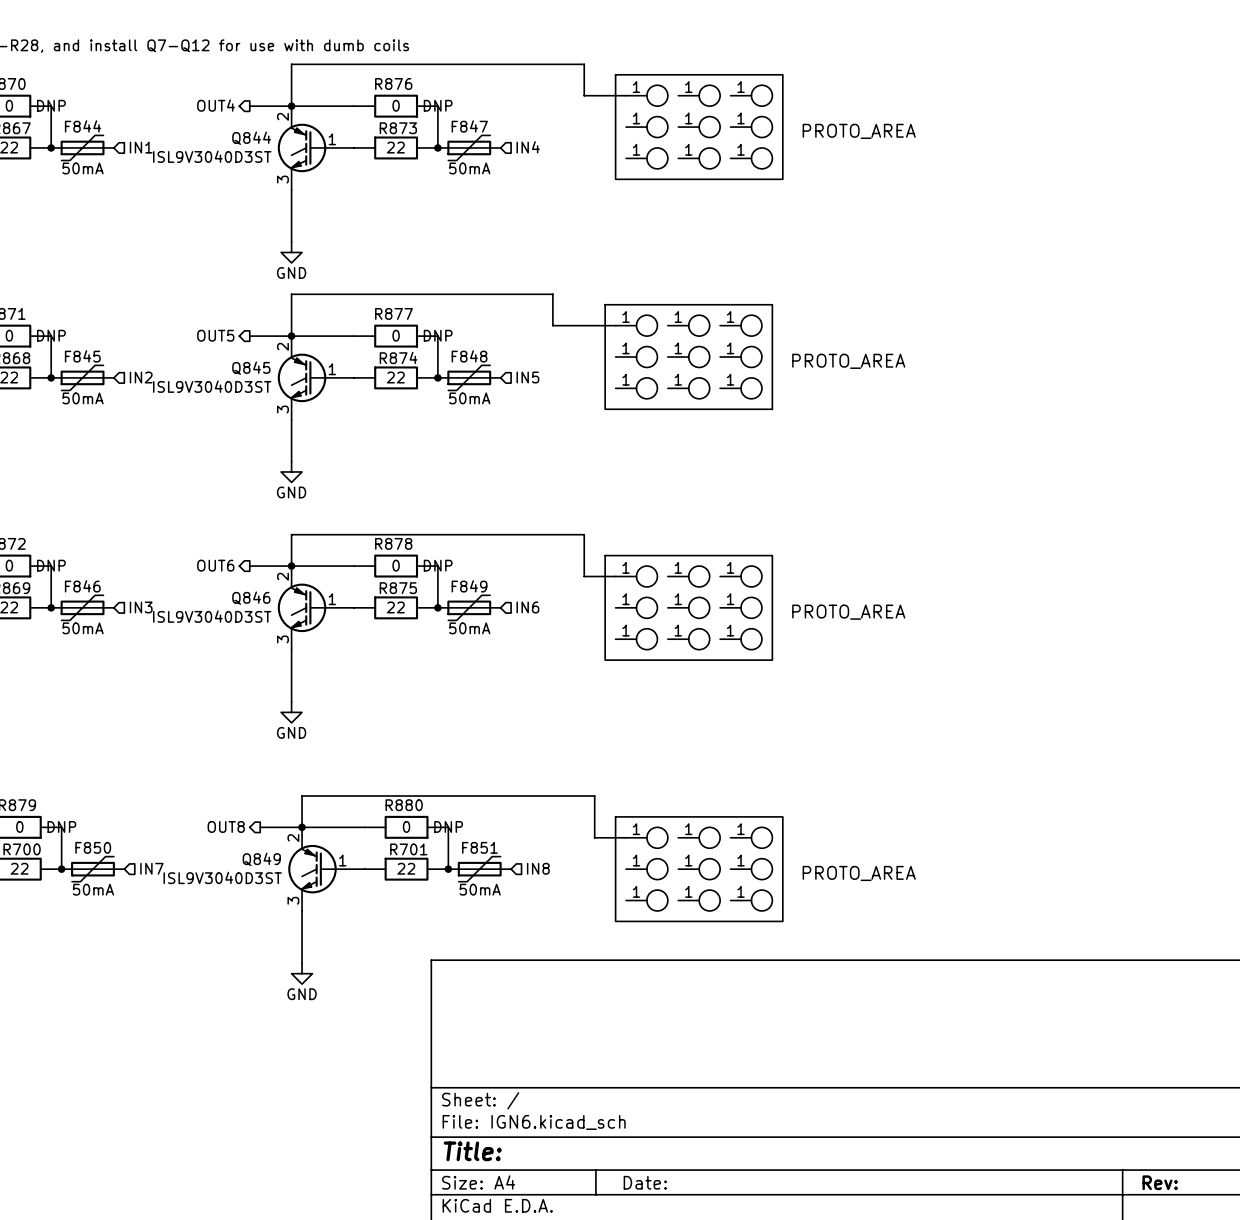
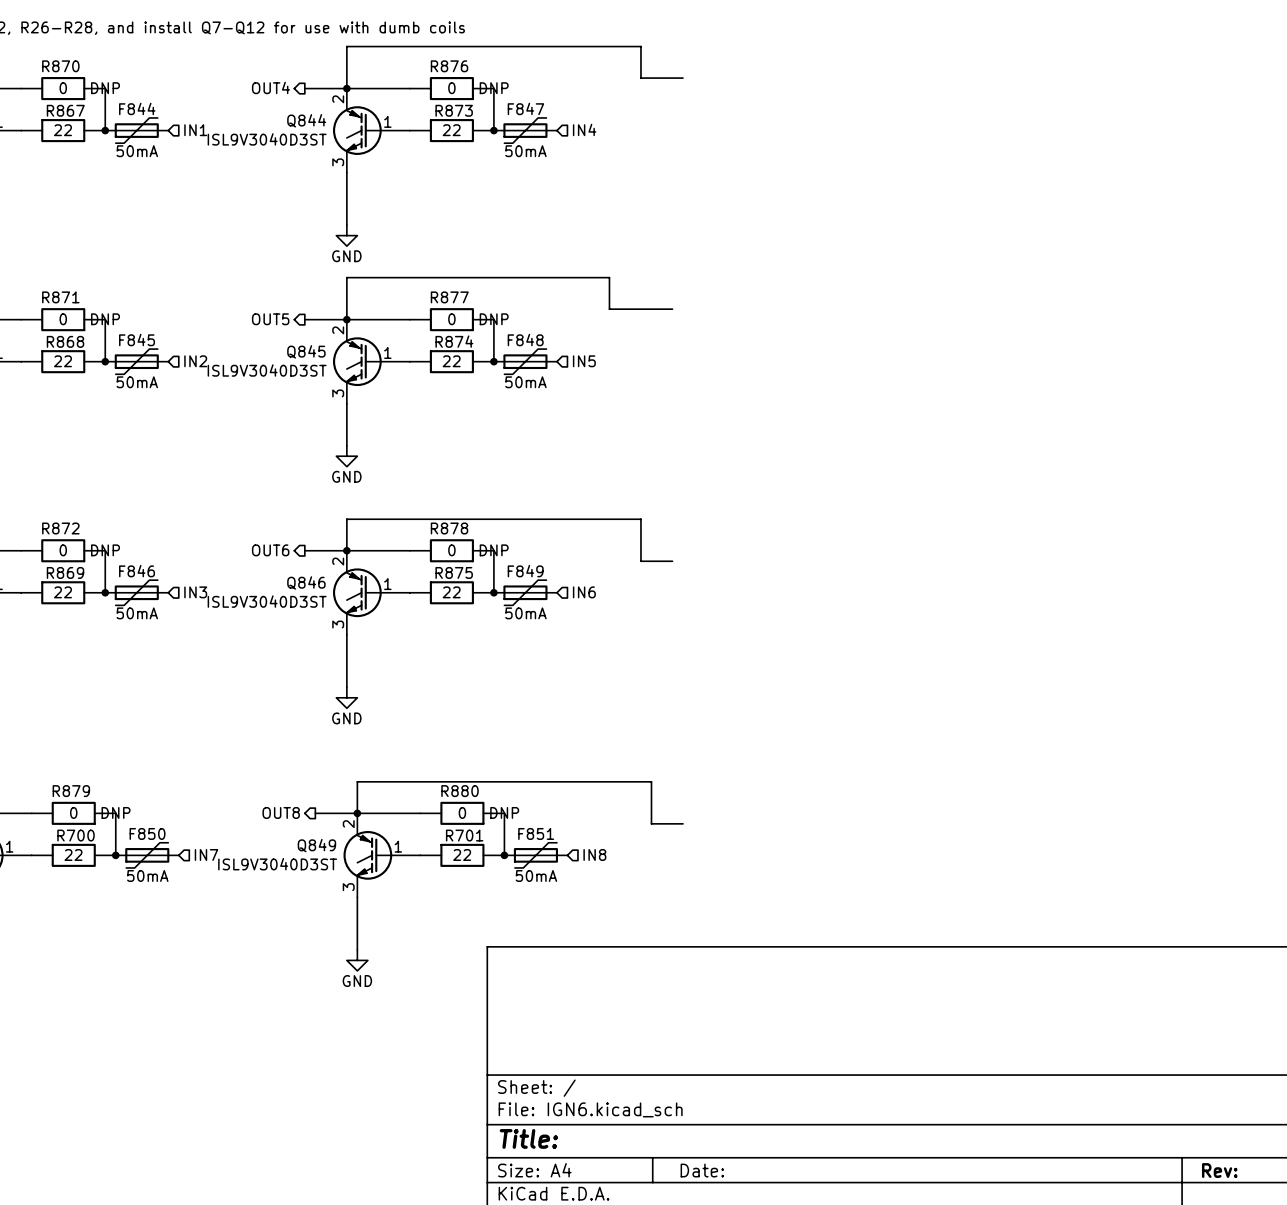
part: PROTO_AREA (699, 127) -> none
part: PROTO_AREA (688, 357) -> none
part: PROTO_AREA (688, 607) -> none
part: PROTO_AREA (699, 869) -> none

